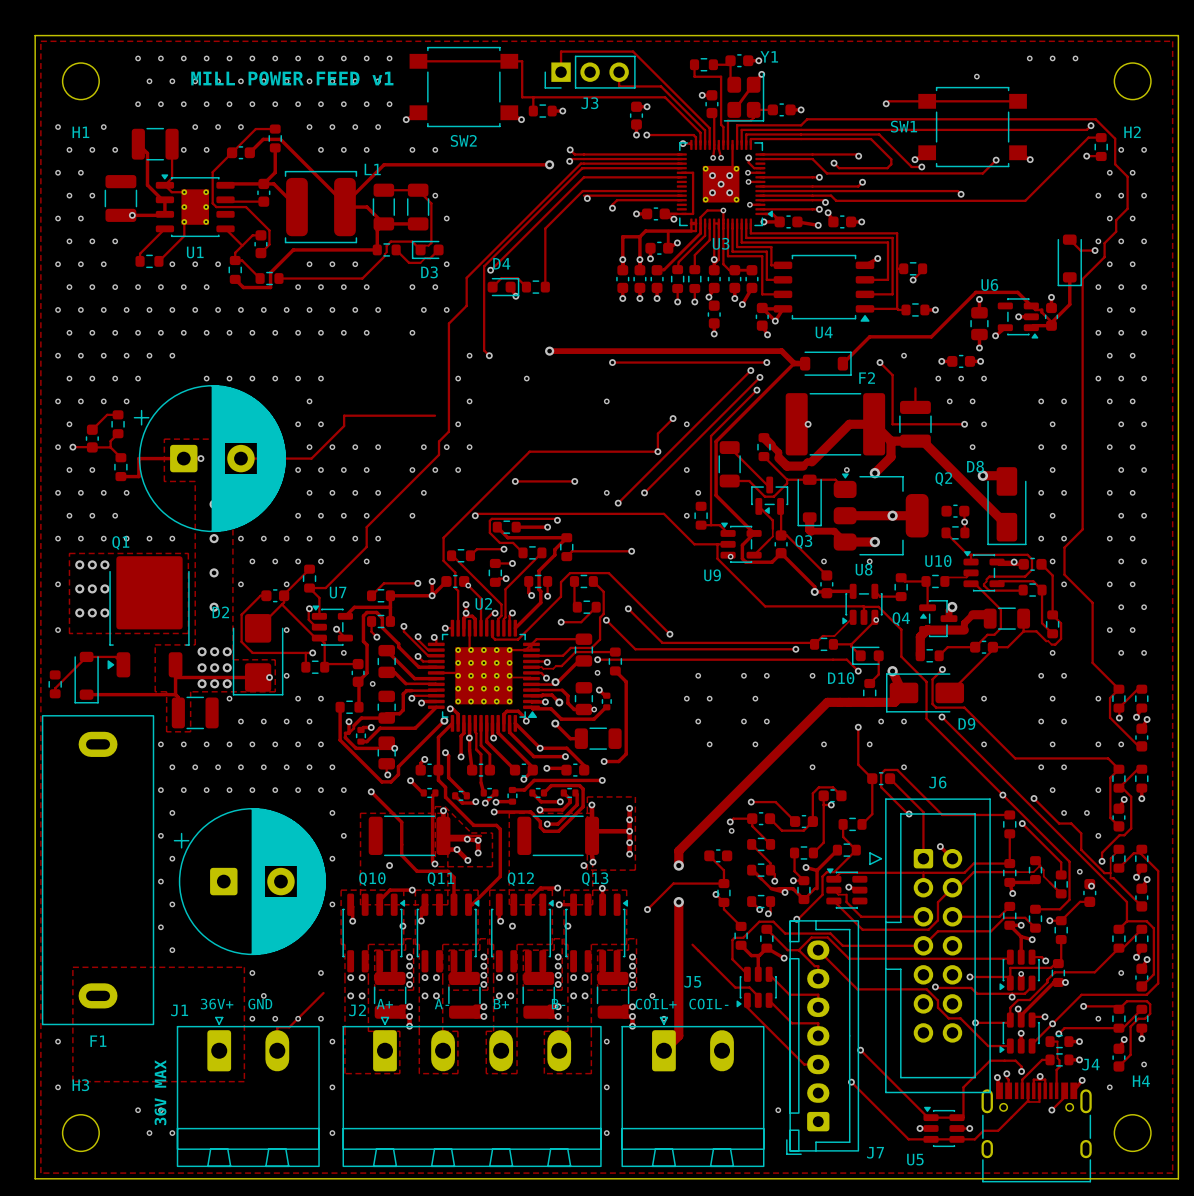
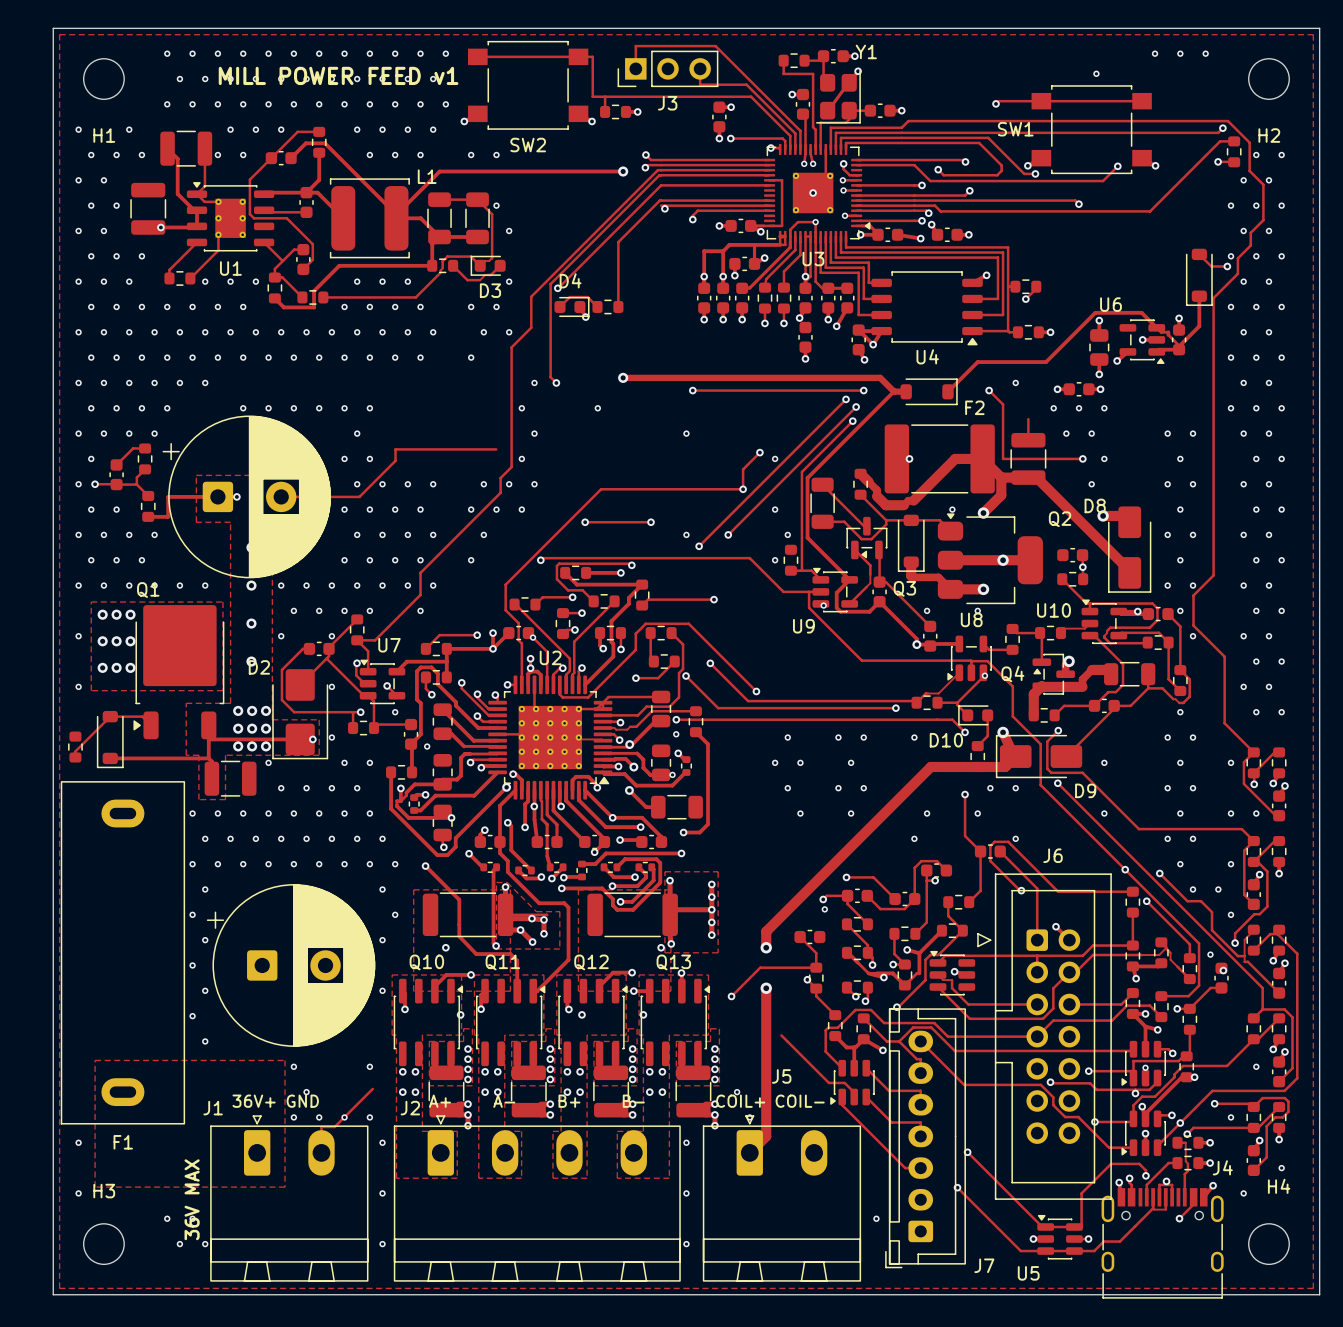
via: (712, 175) -> none
via: (729, 175) -> none
via: (712, 192) -> none
via: (729, 192) -> none

